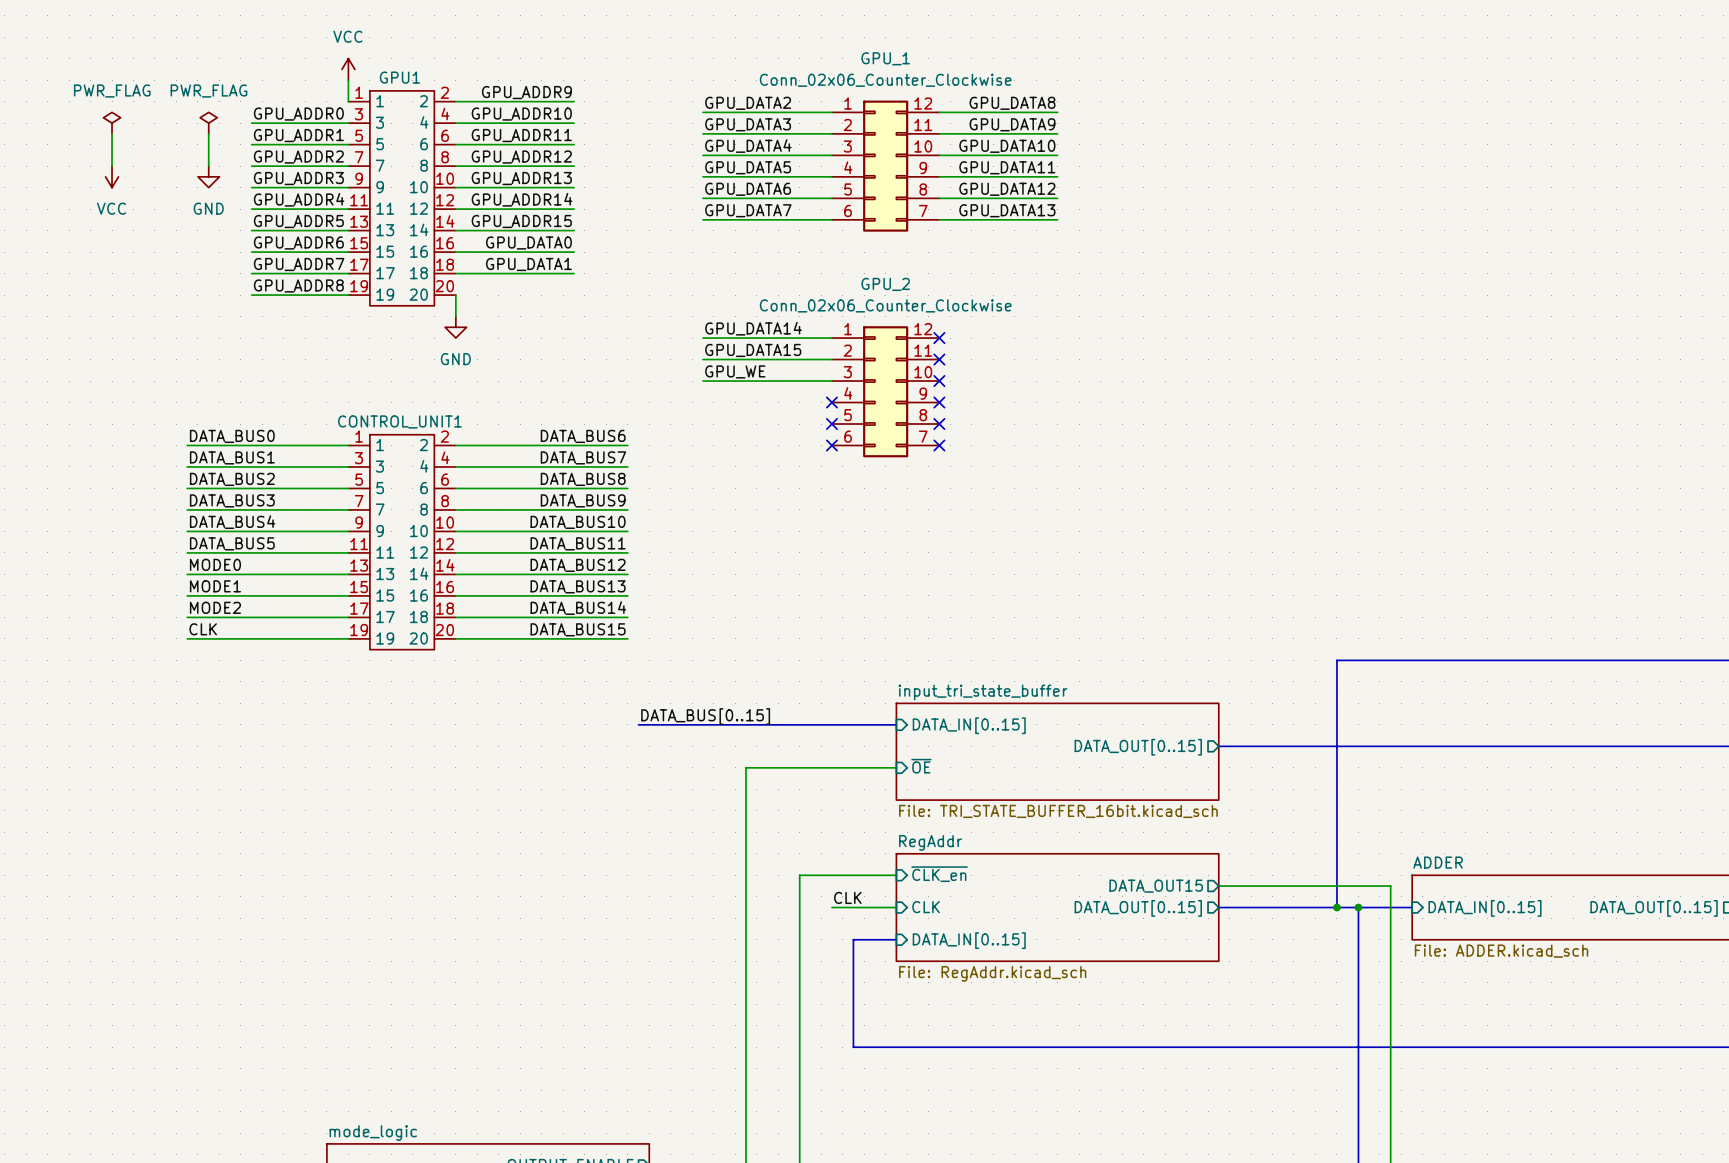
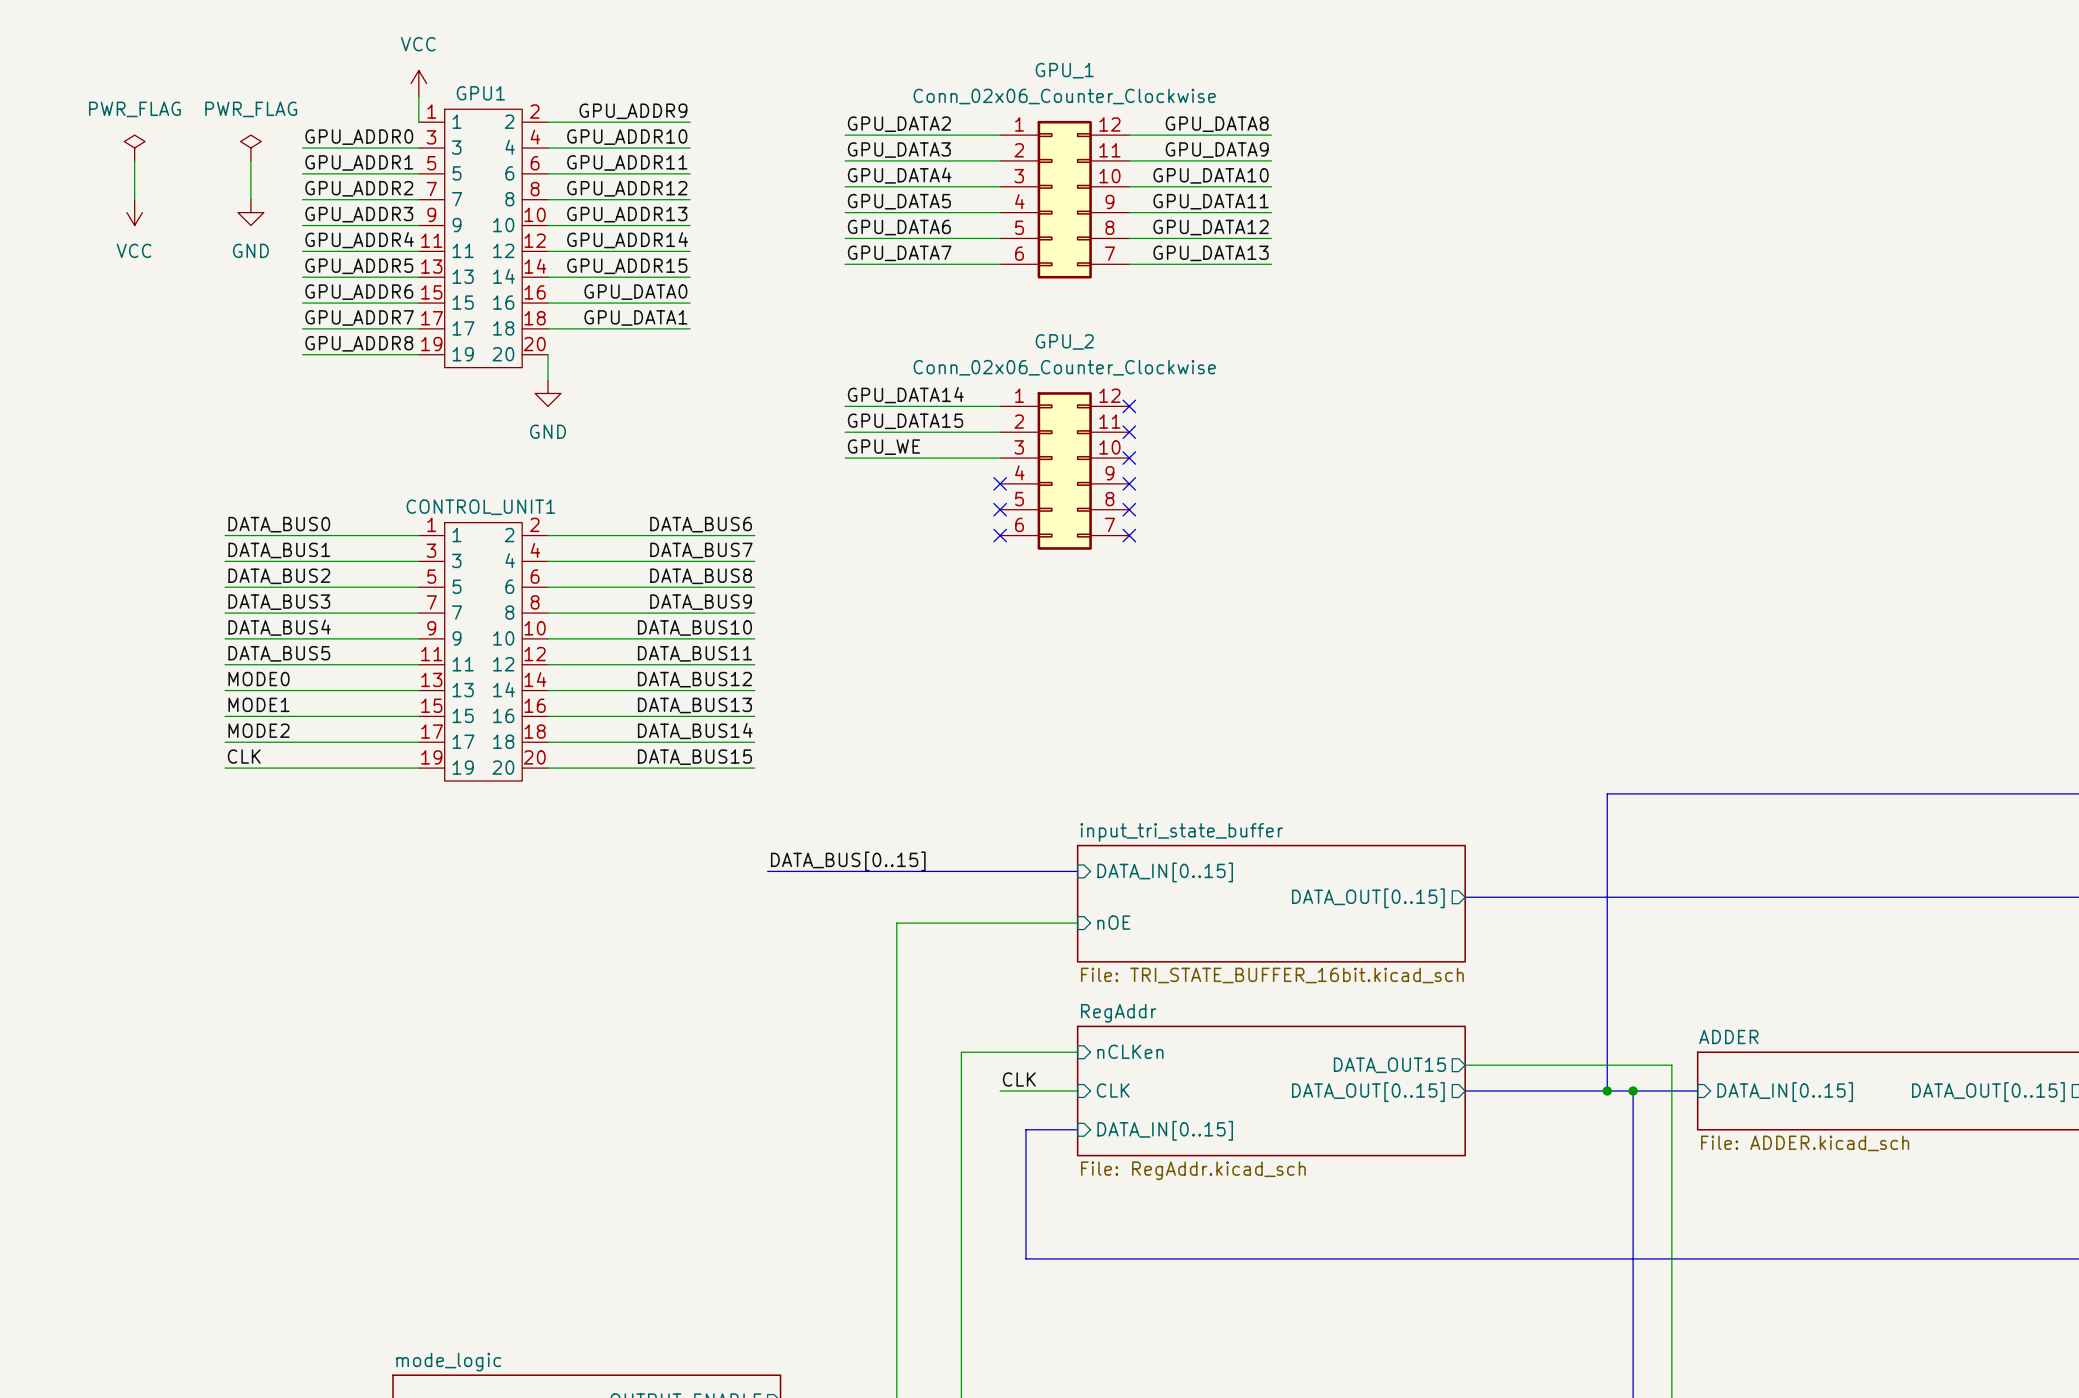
sheet pin: ~{OE} (921, 766) -> nOE (1113, 922)
sheet pin: ~{CLK_en} (939, 874) -> nCLKen (1130, 1051)

